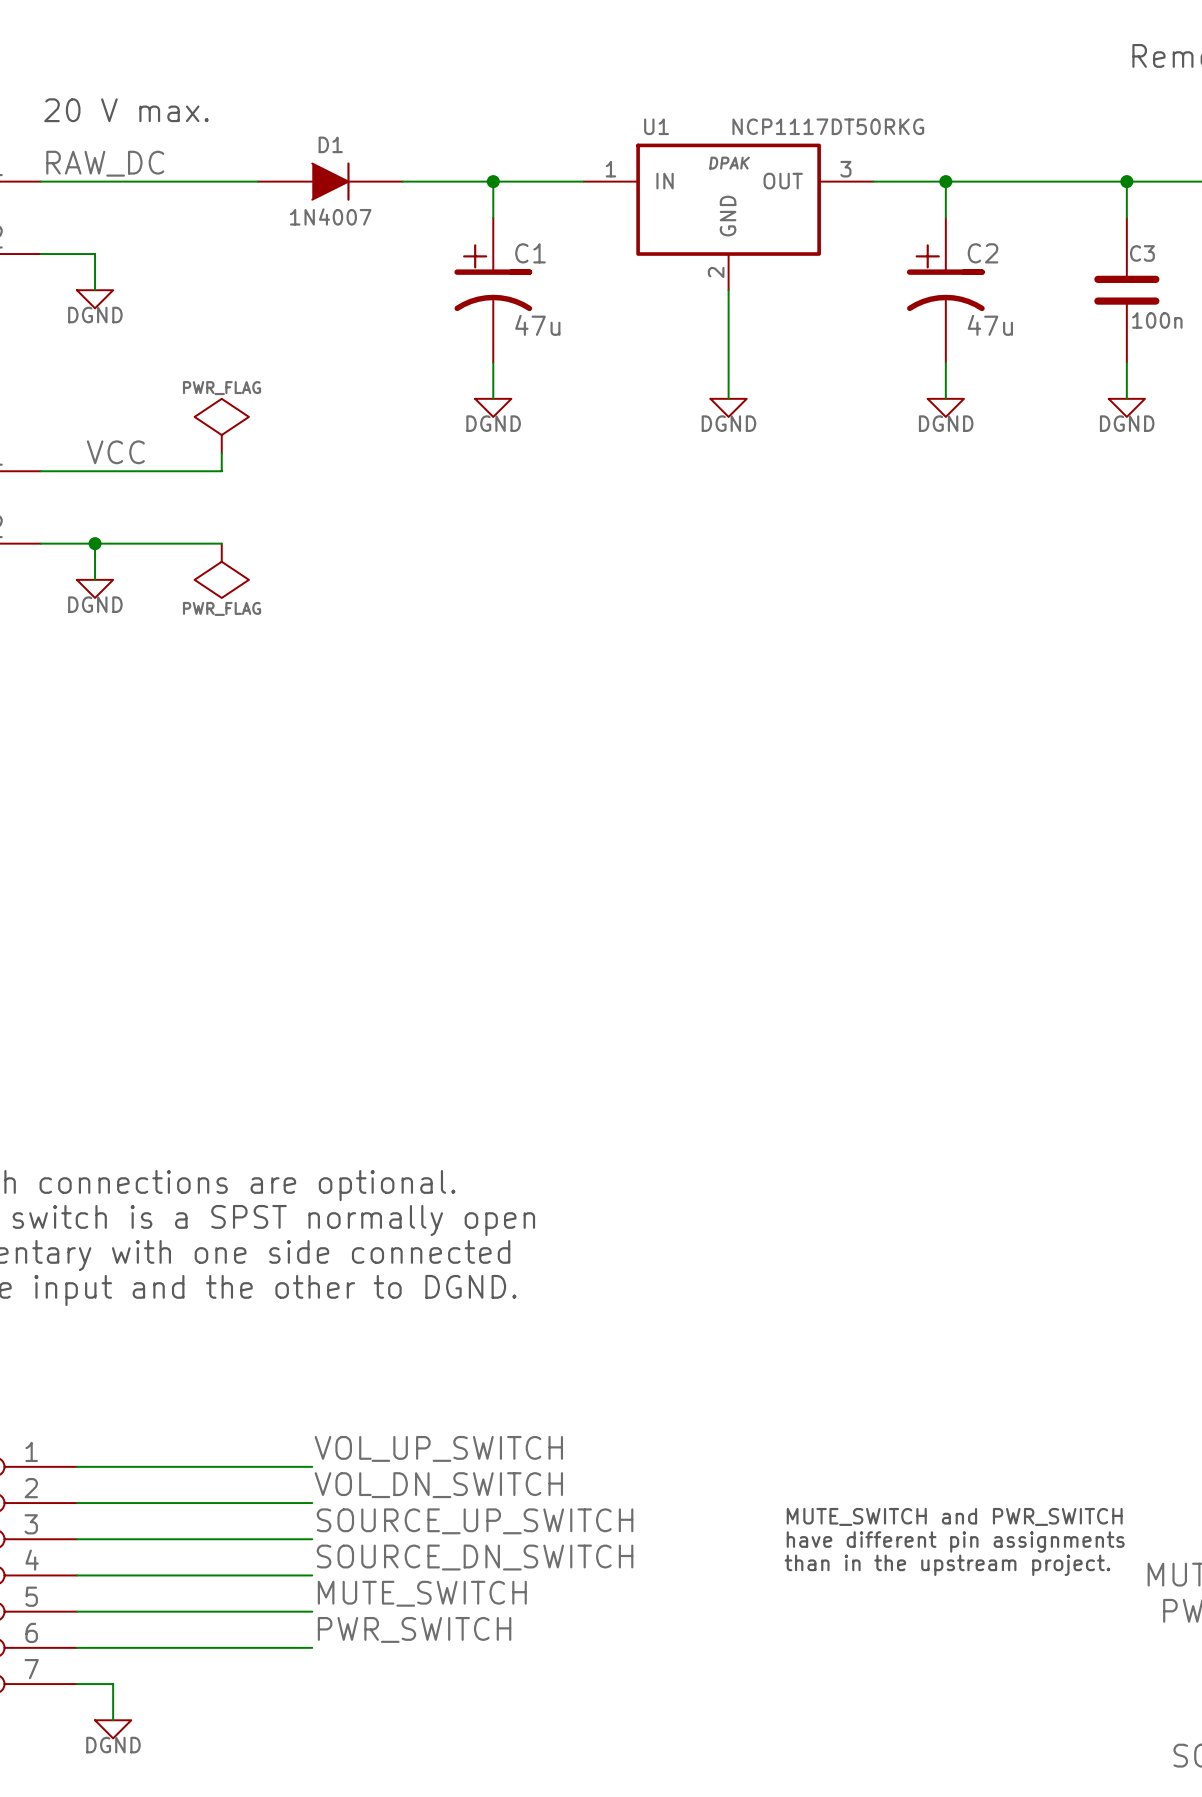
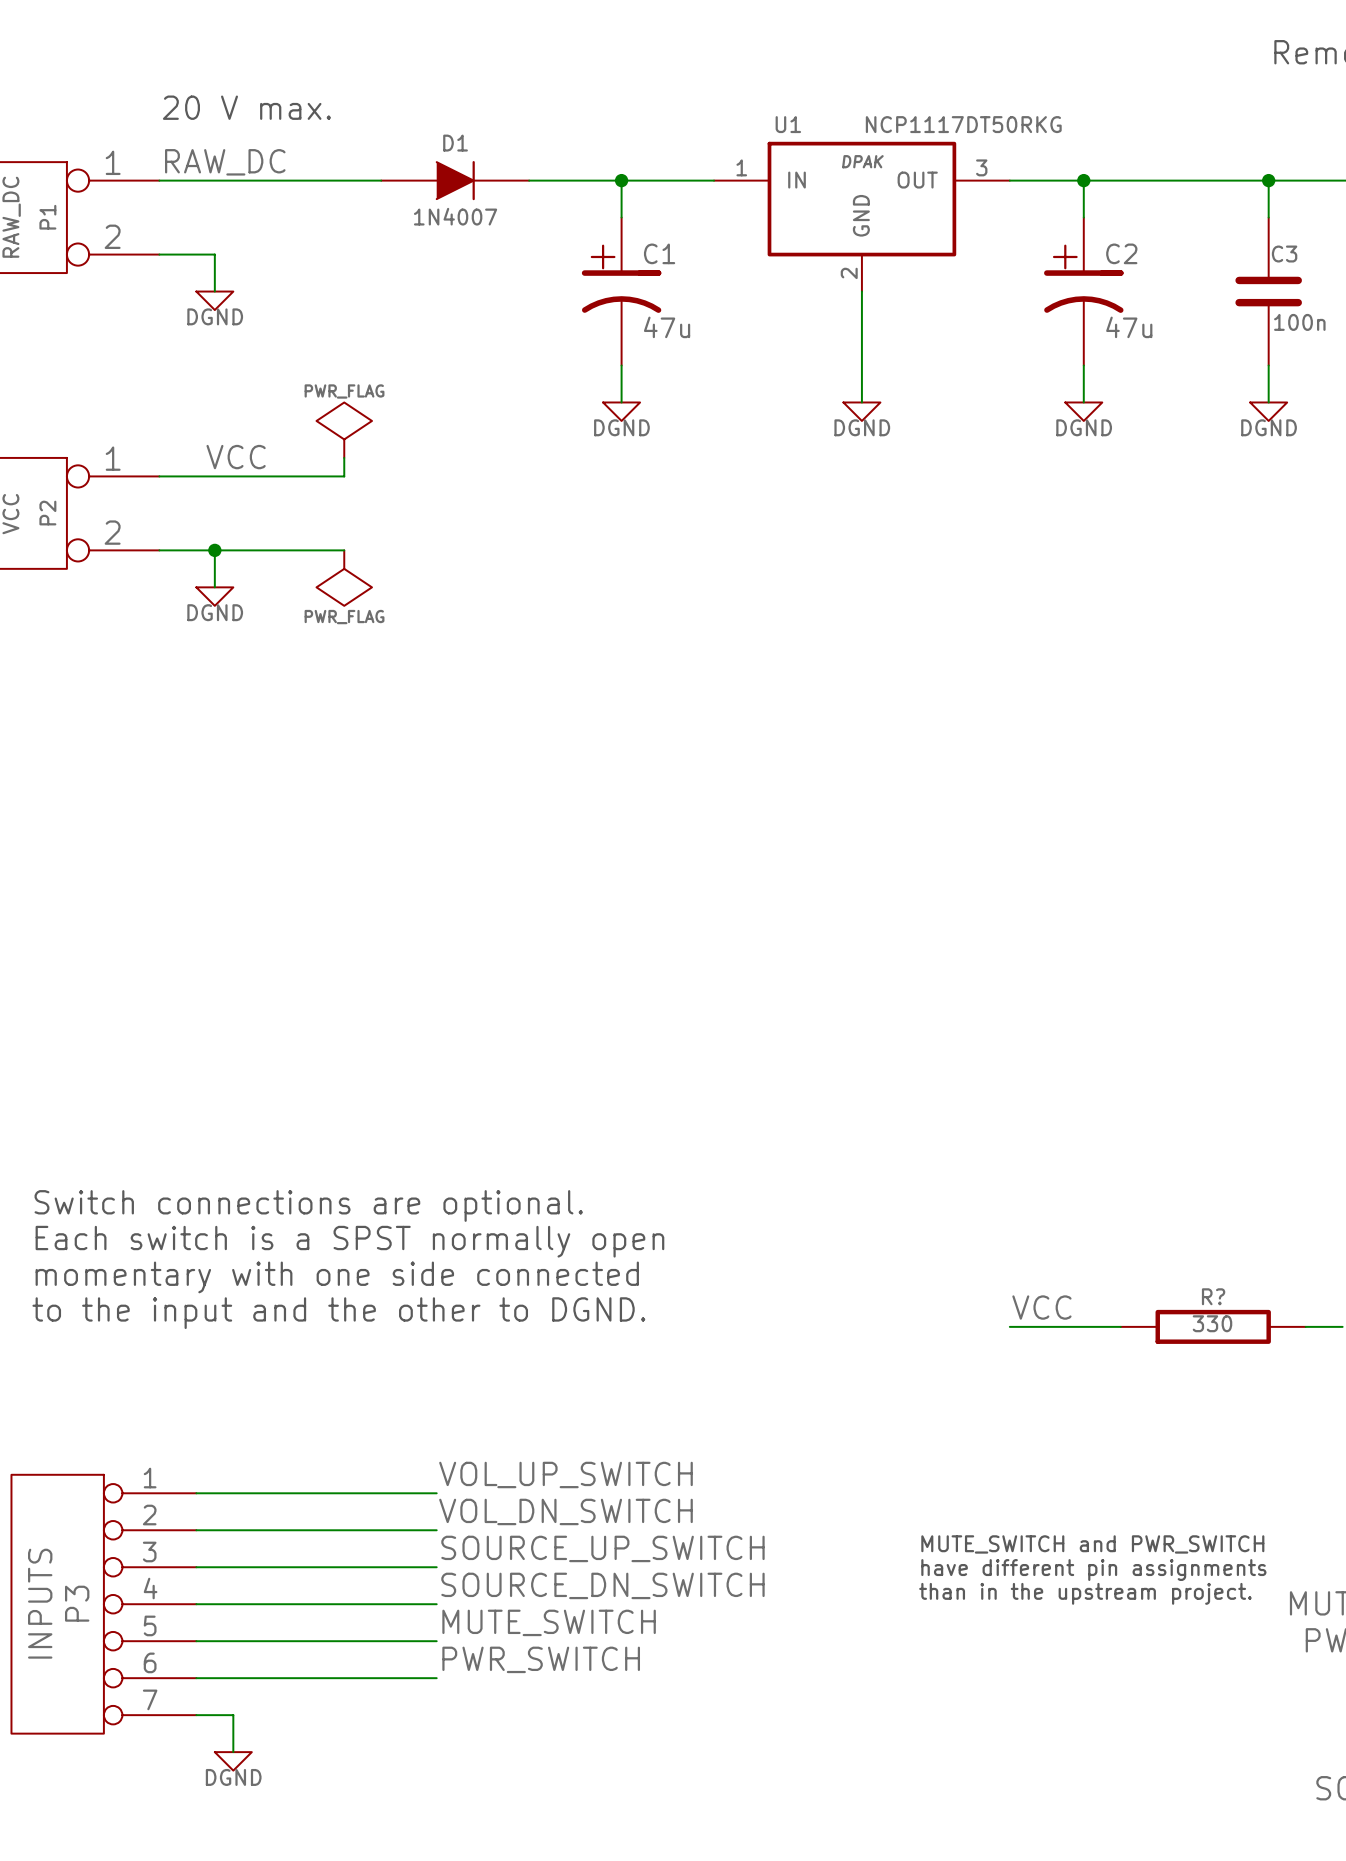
label: none -> VCC (1041, 1307)
wire: none -> (1009, 1326) (1120, 1326)
R?: none -> 330 (1213, 1326)
wire: none -> (1305, 1326) (1342, 1326)

